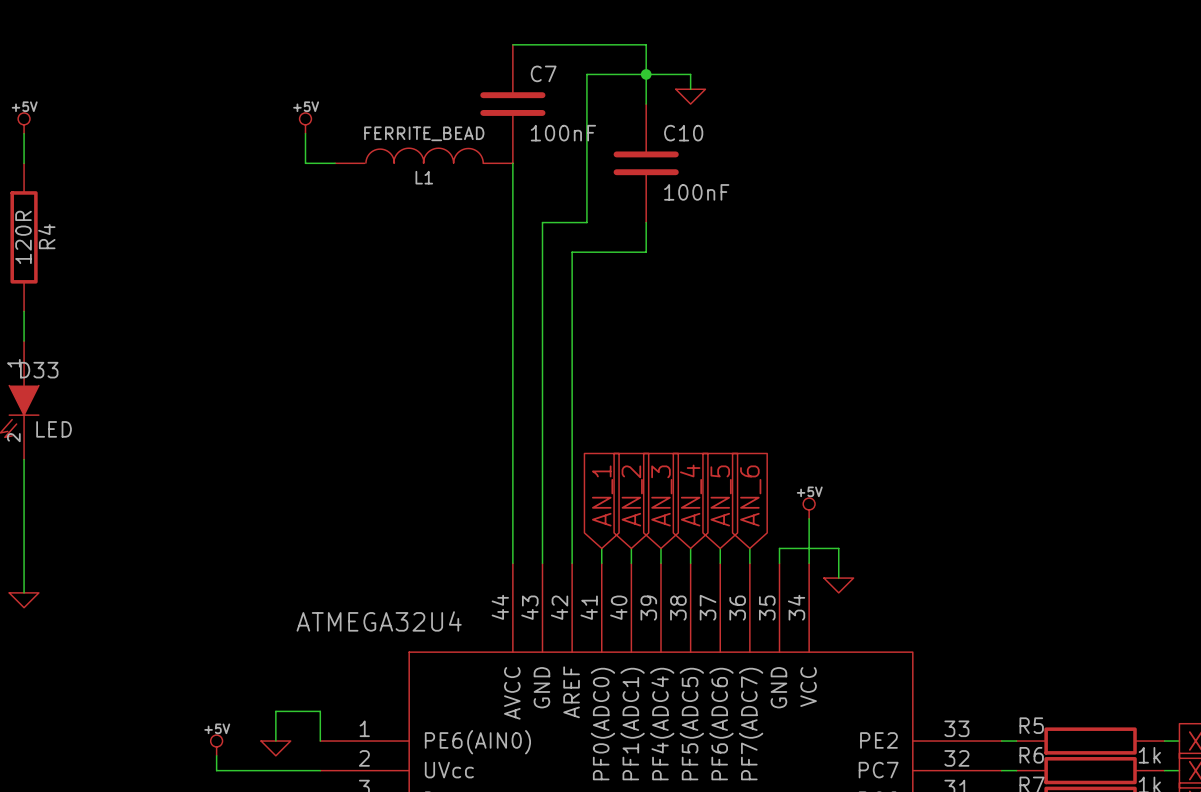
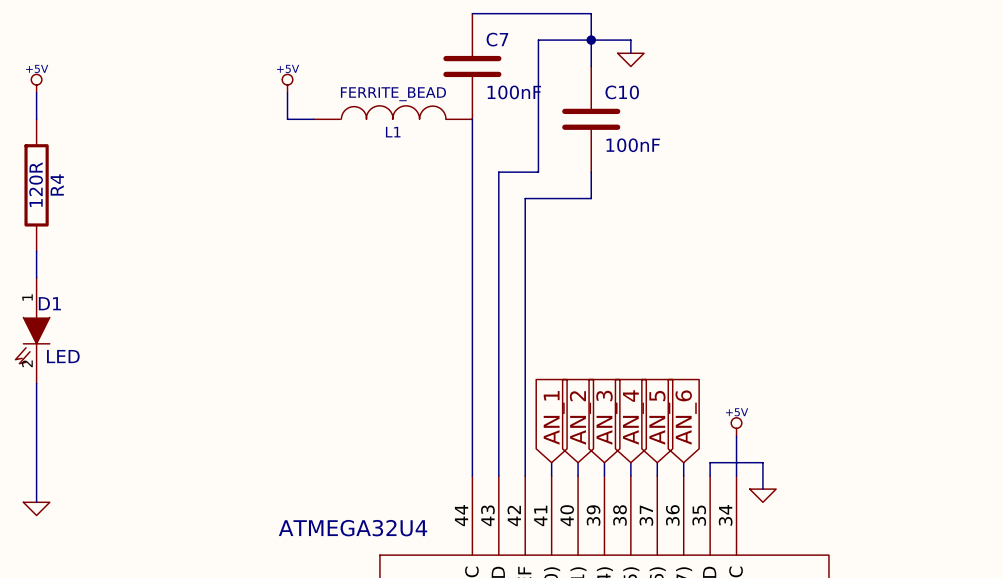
D33 name: D33 (39, 370) -> D1 (49, 303)

